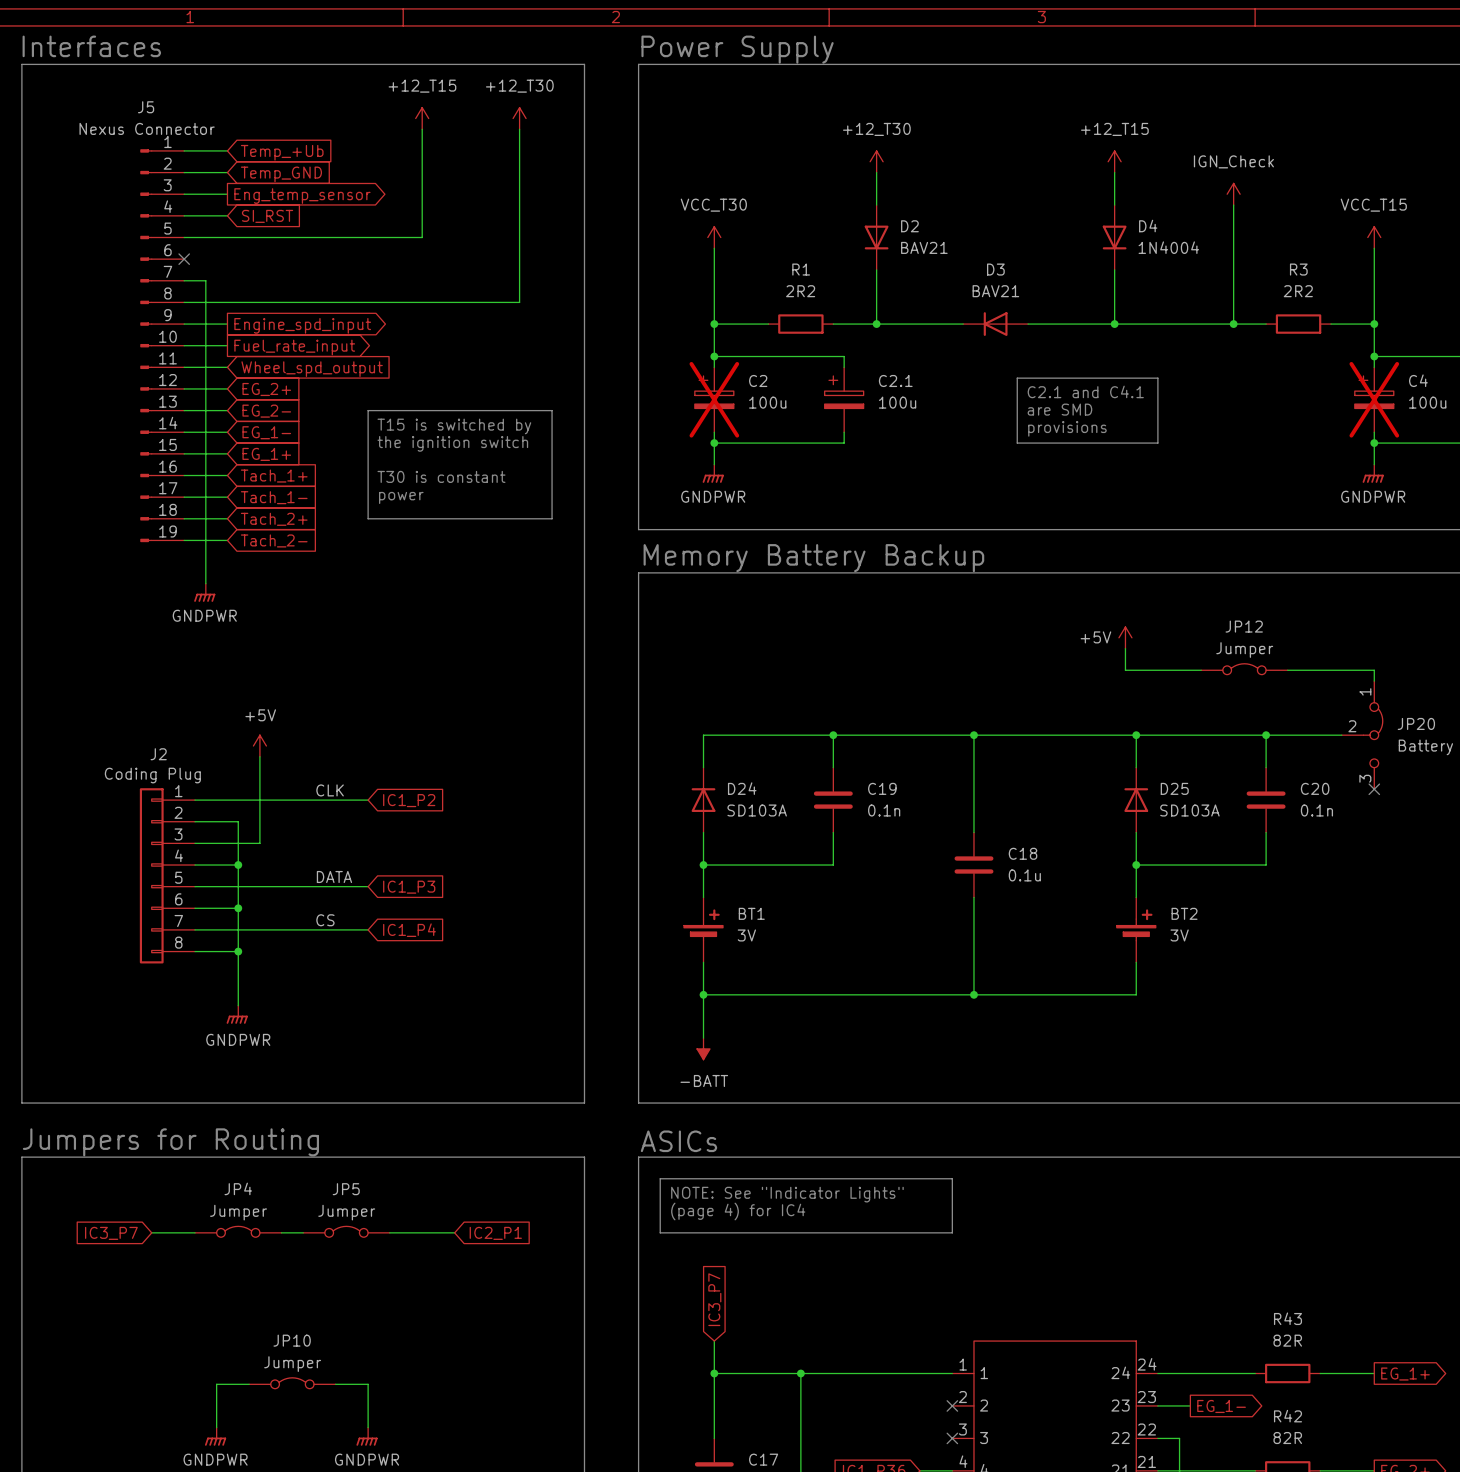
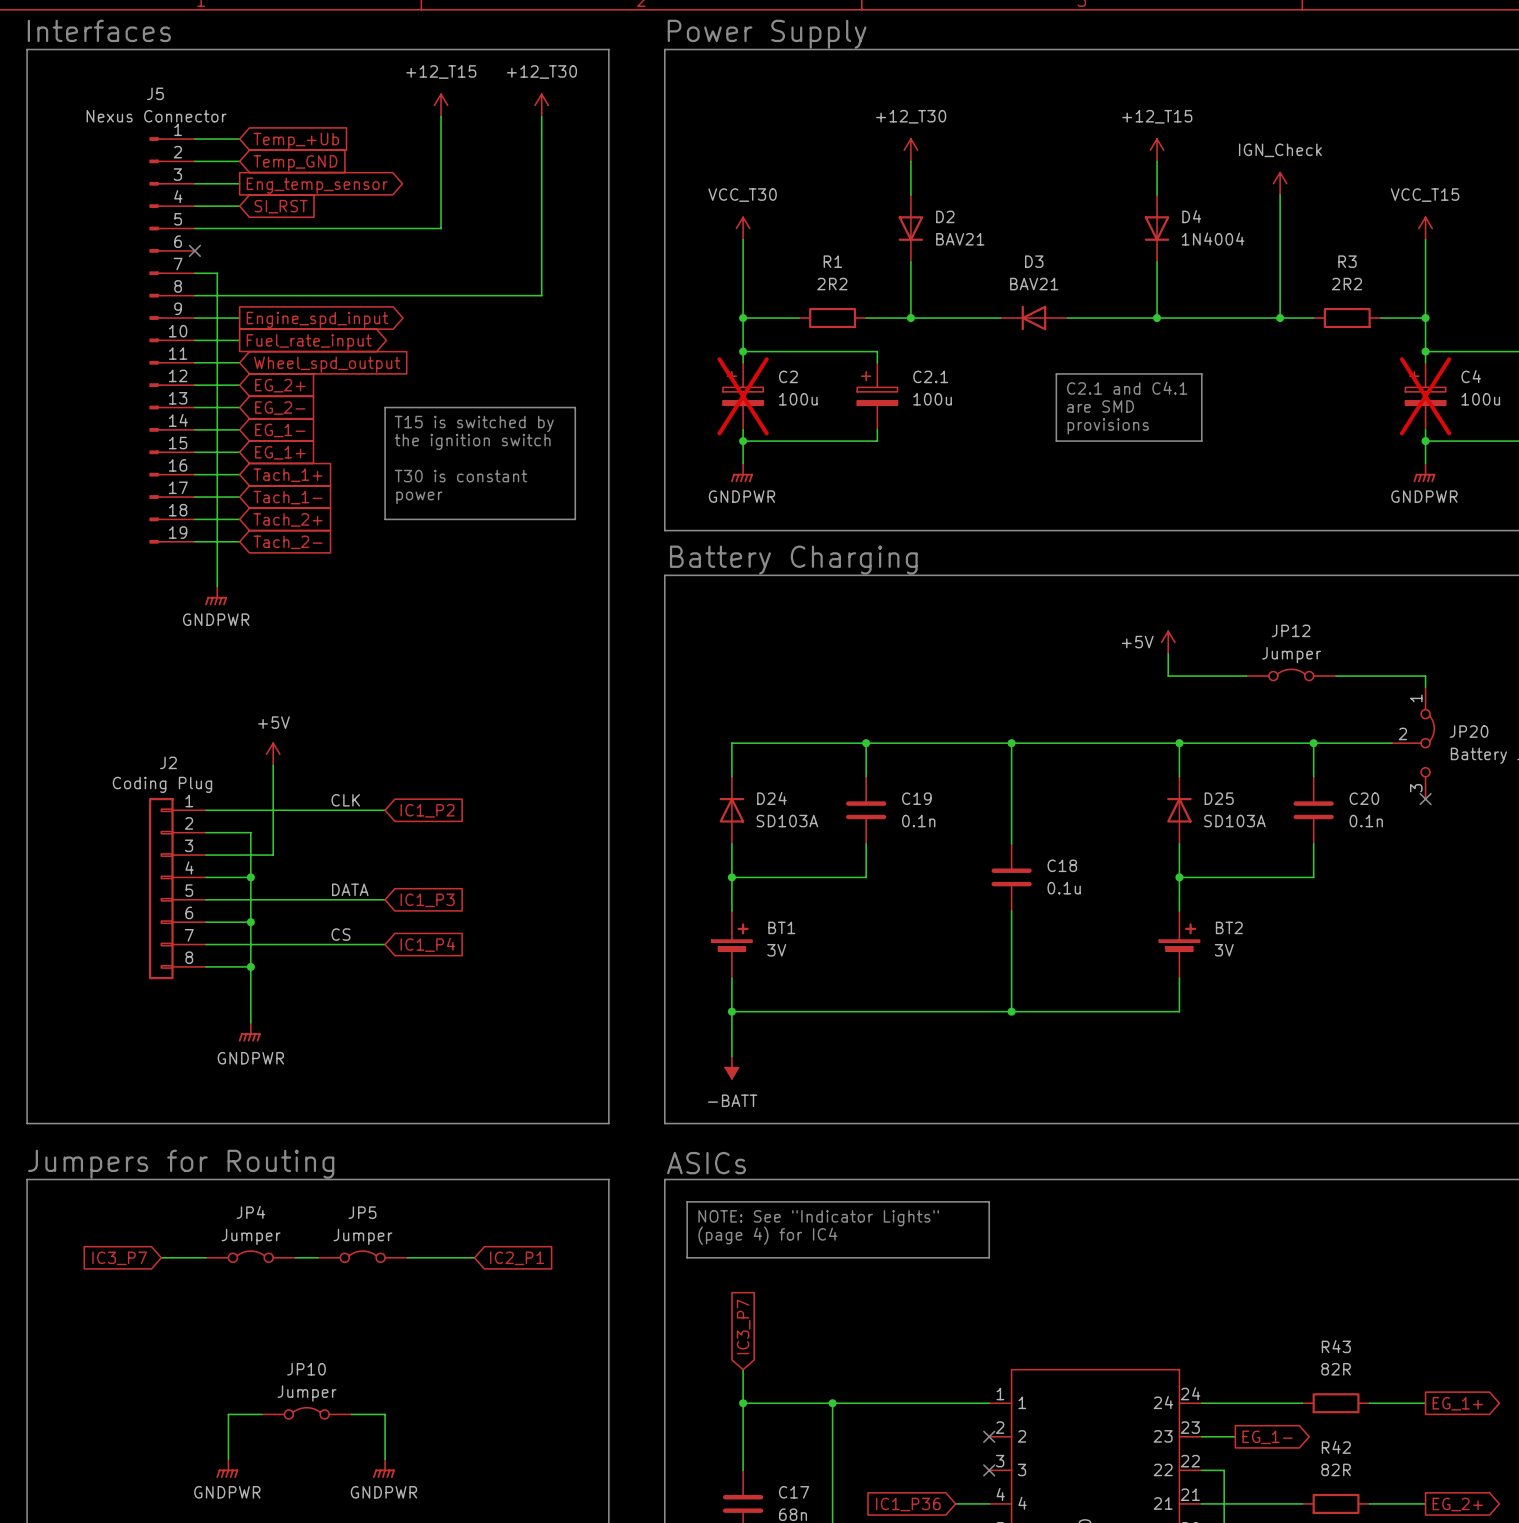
text: Memory Battery Backup (813, 558) -> Battery Charging (793, 560)

